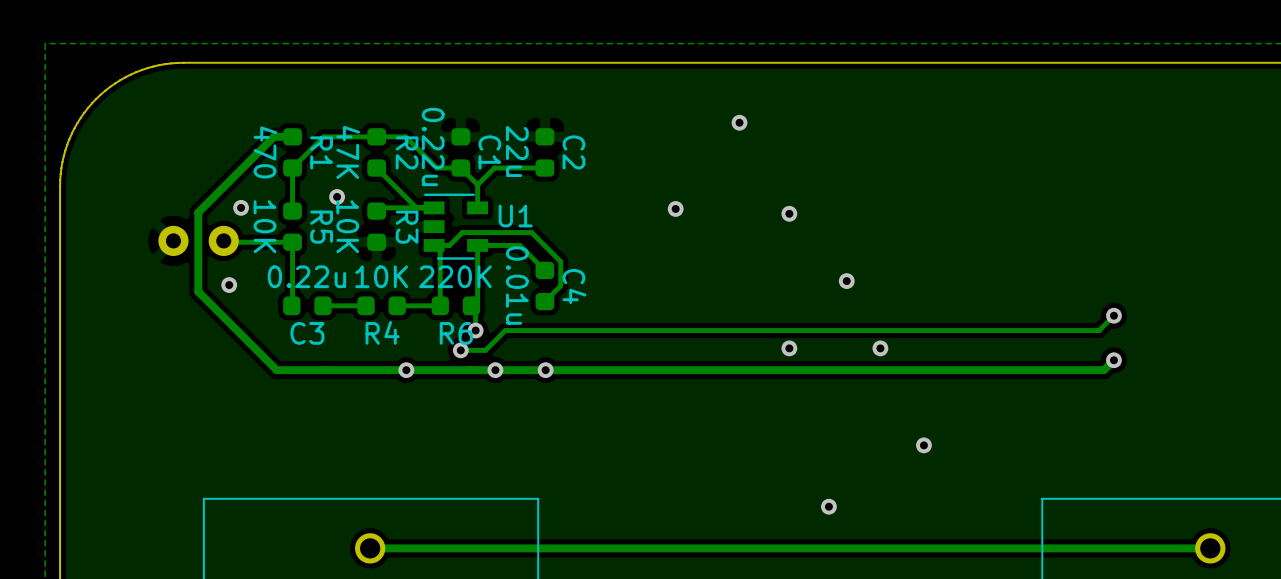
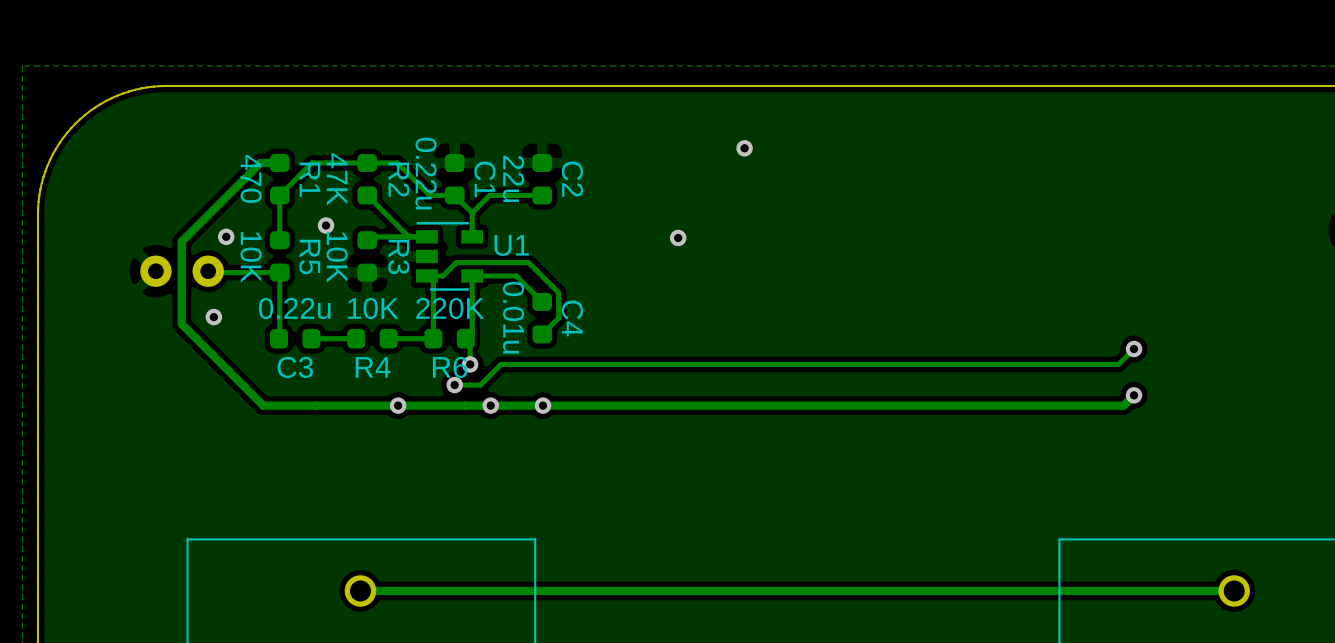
via: (789, 213) -> none
via: (846, 281) -> none
via: (789, 348) -> none
via: (880, 348) -> none
via: (923, 445) -> none
via: (828, 506) -> none

